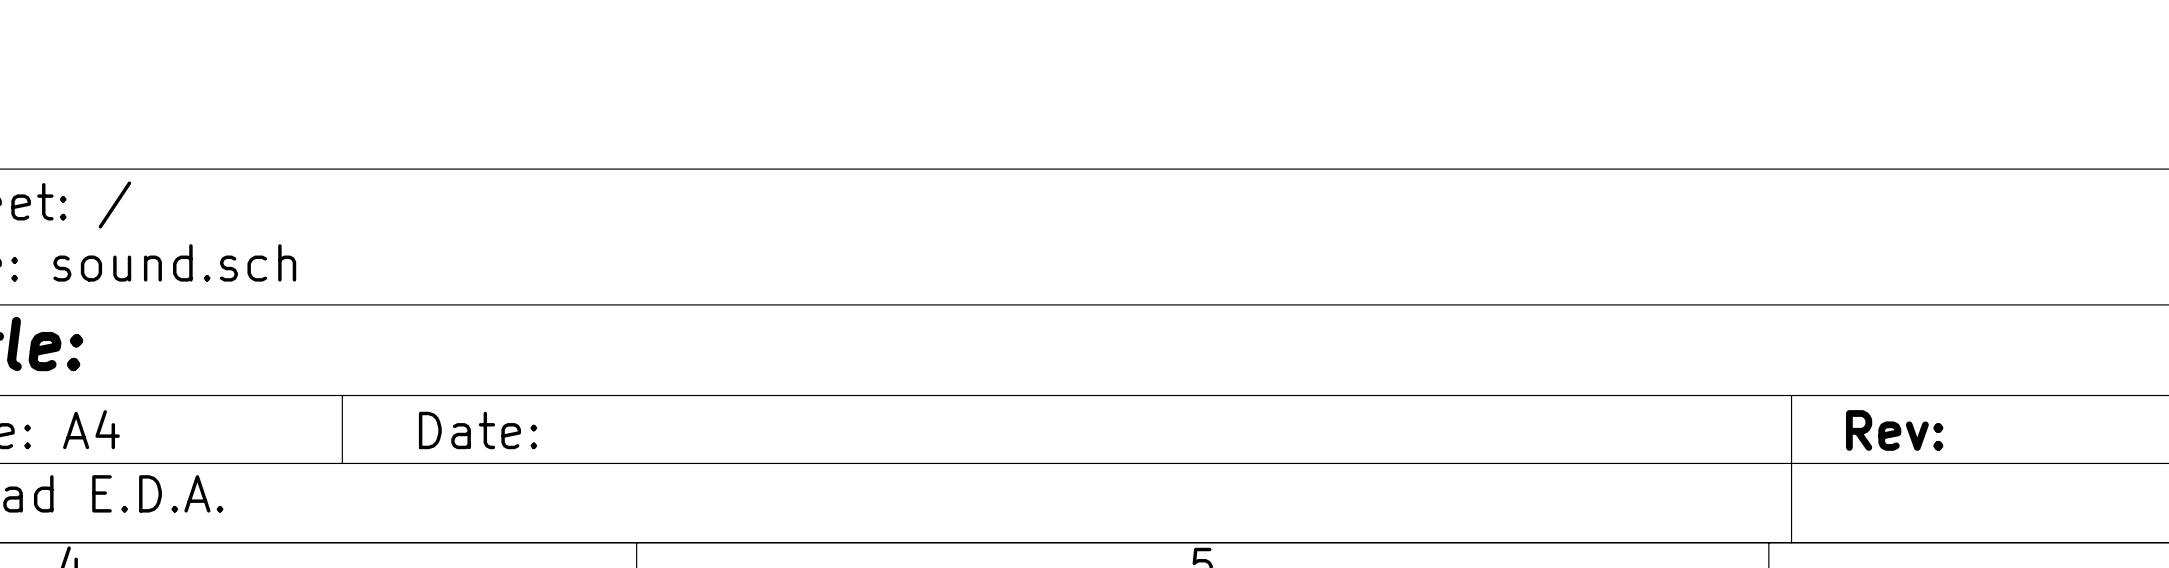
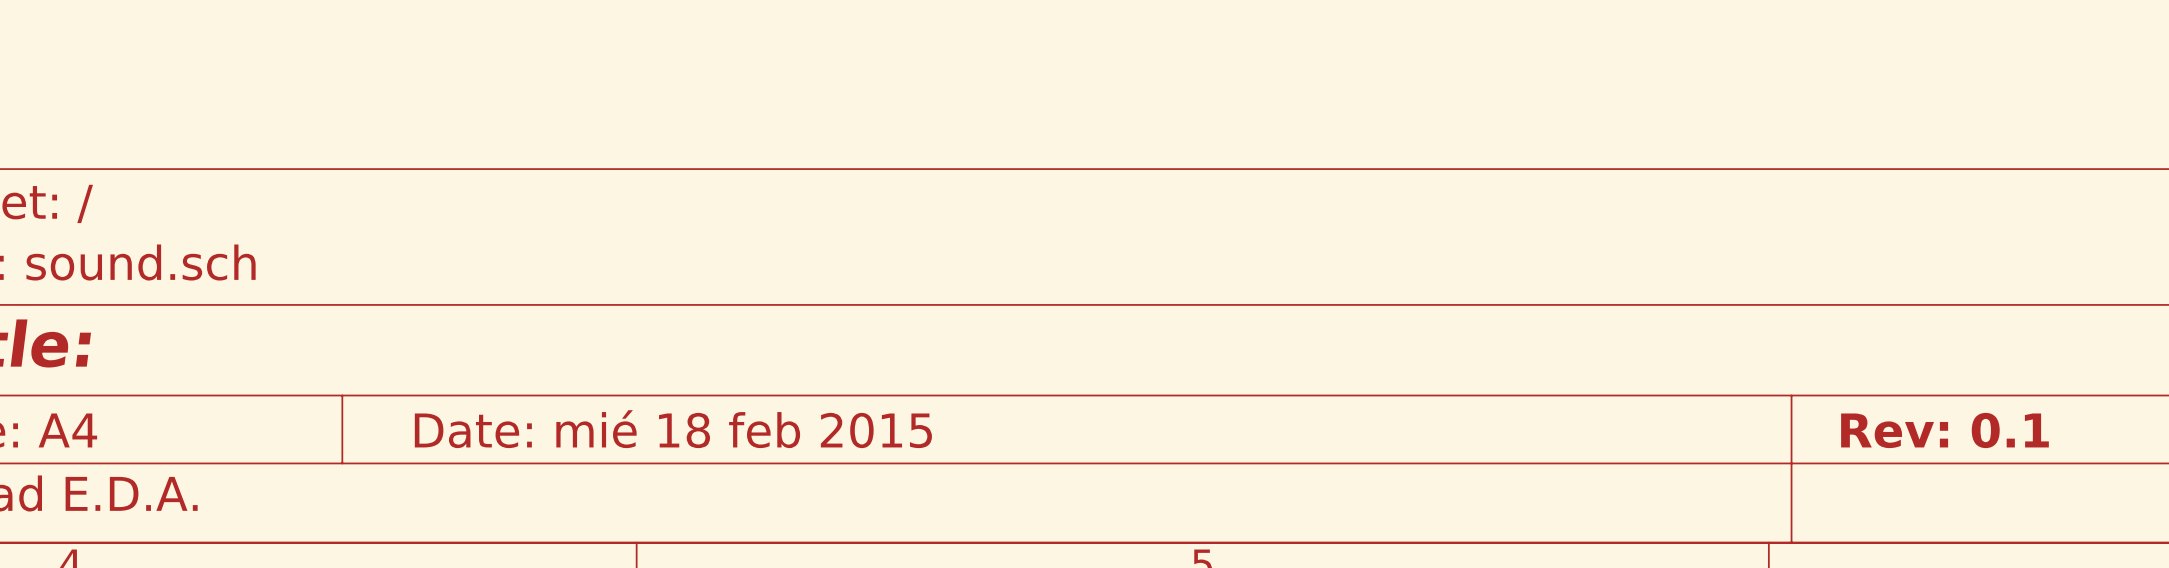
title block: Date: (478, 430) -> Date: mié 18 feb 2015 (673, 429)
title block: Rev: (1894, 430) -> Rev: 0.1 (1944, 430)

